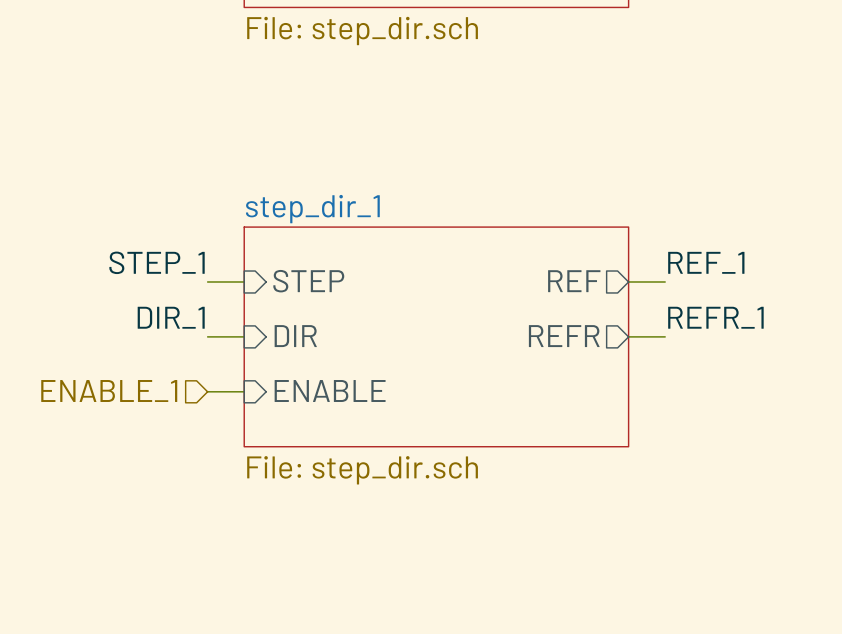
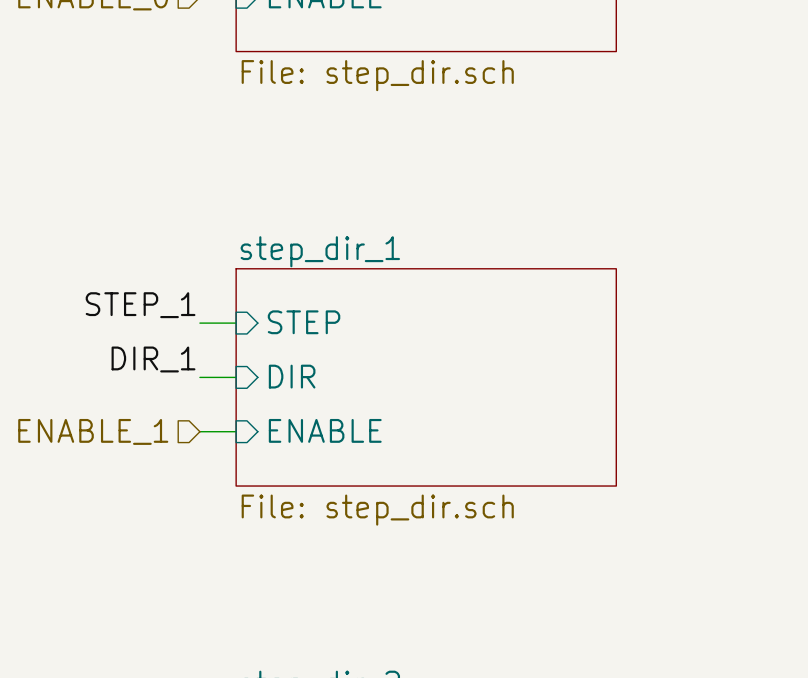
label: REF_1 (706, 262) -> none
sheet pin: REF (574, 281) -> none
wire: (628, 281) (665, 281) -> none
label: REFR_1 (715, 317) -> none
sheet pin: REFR (564, 336) -> none
wire: (628, 336) (665, 336) -> none

